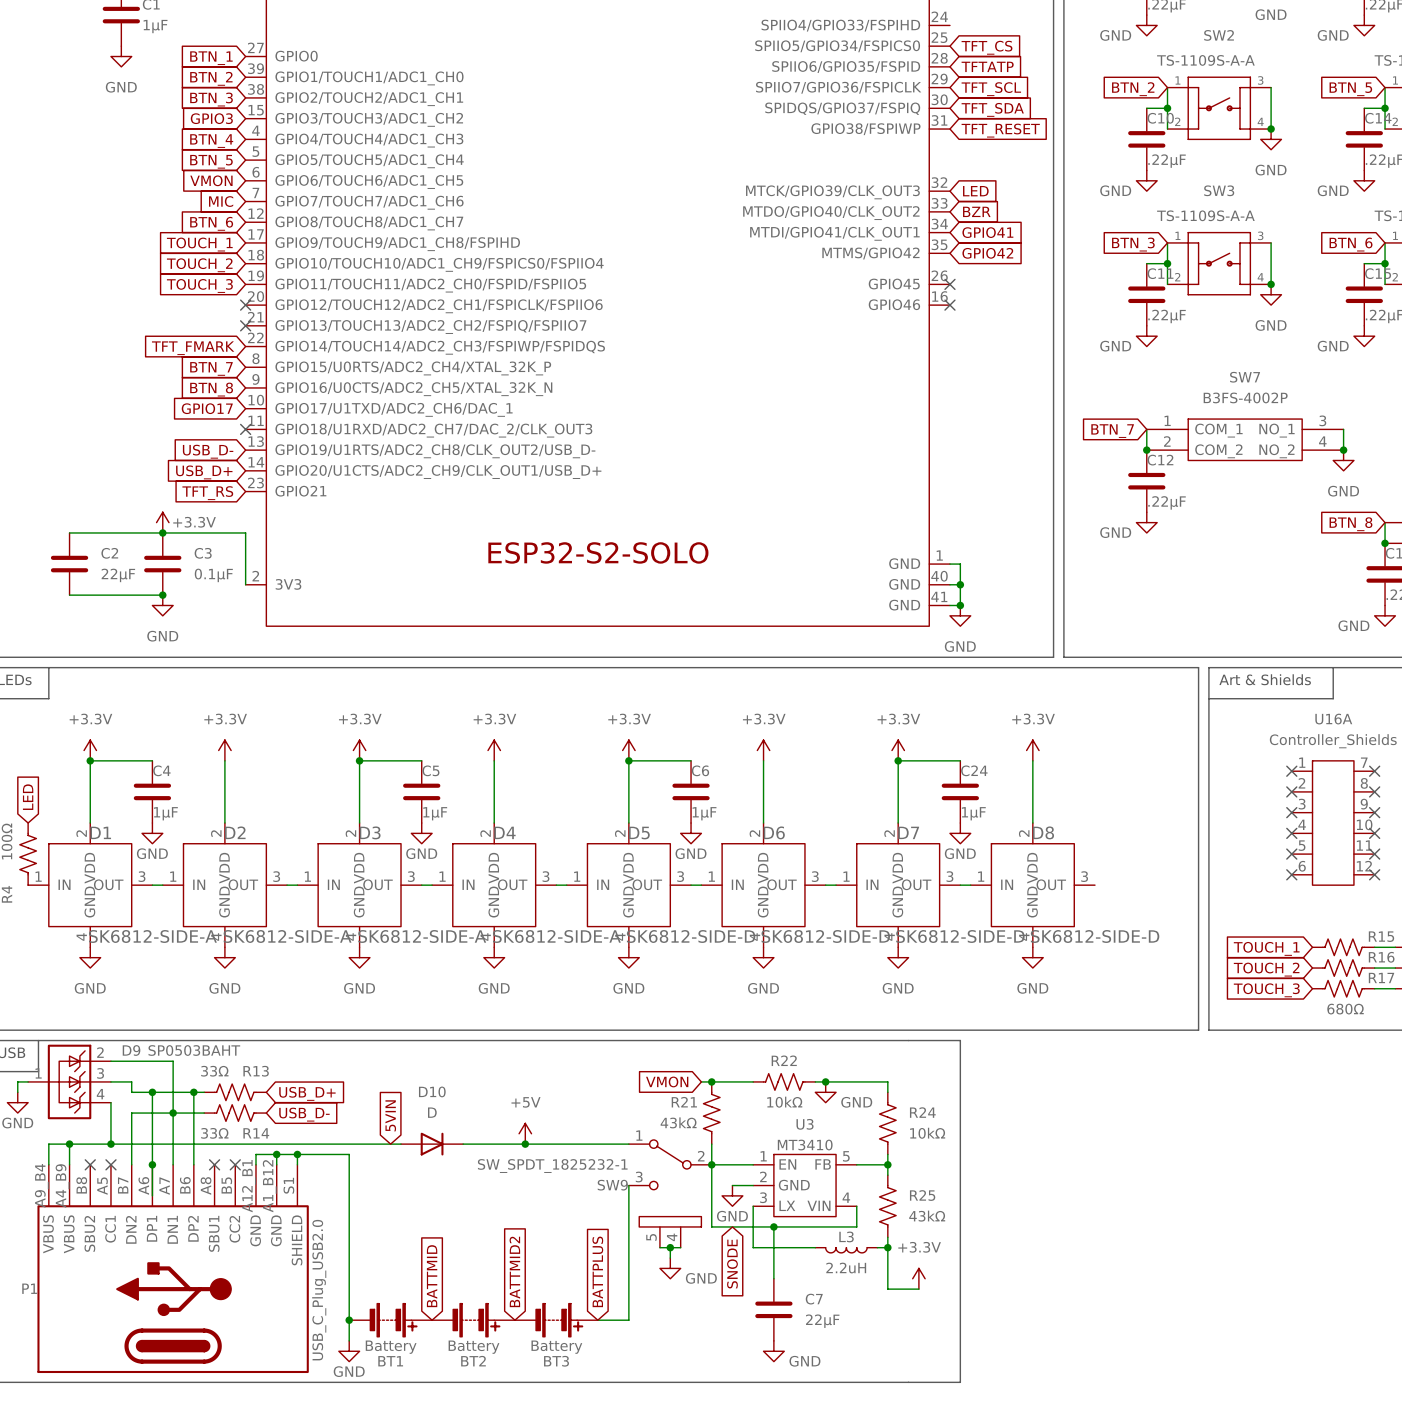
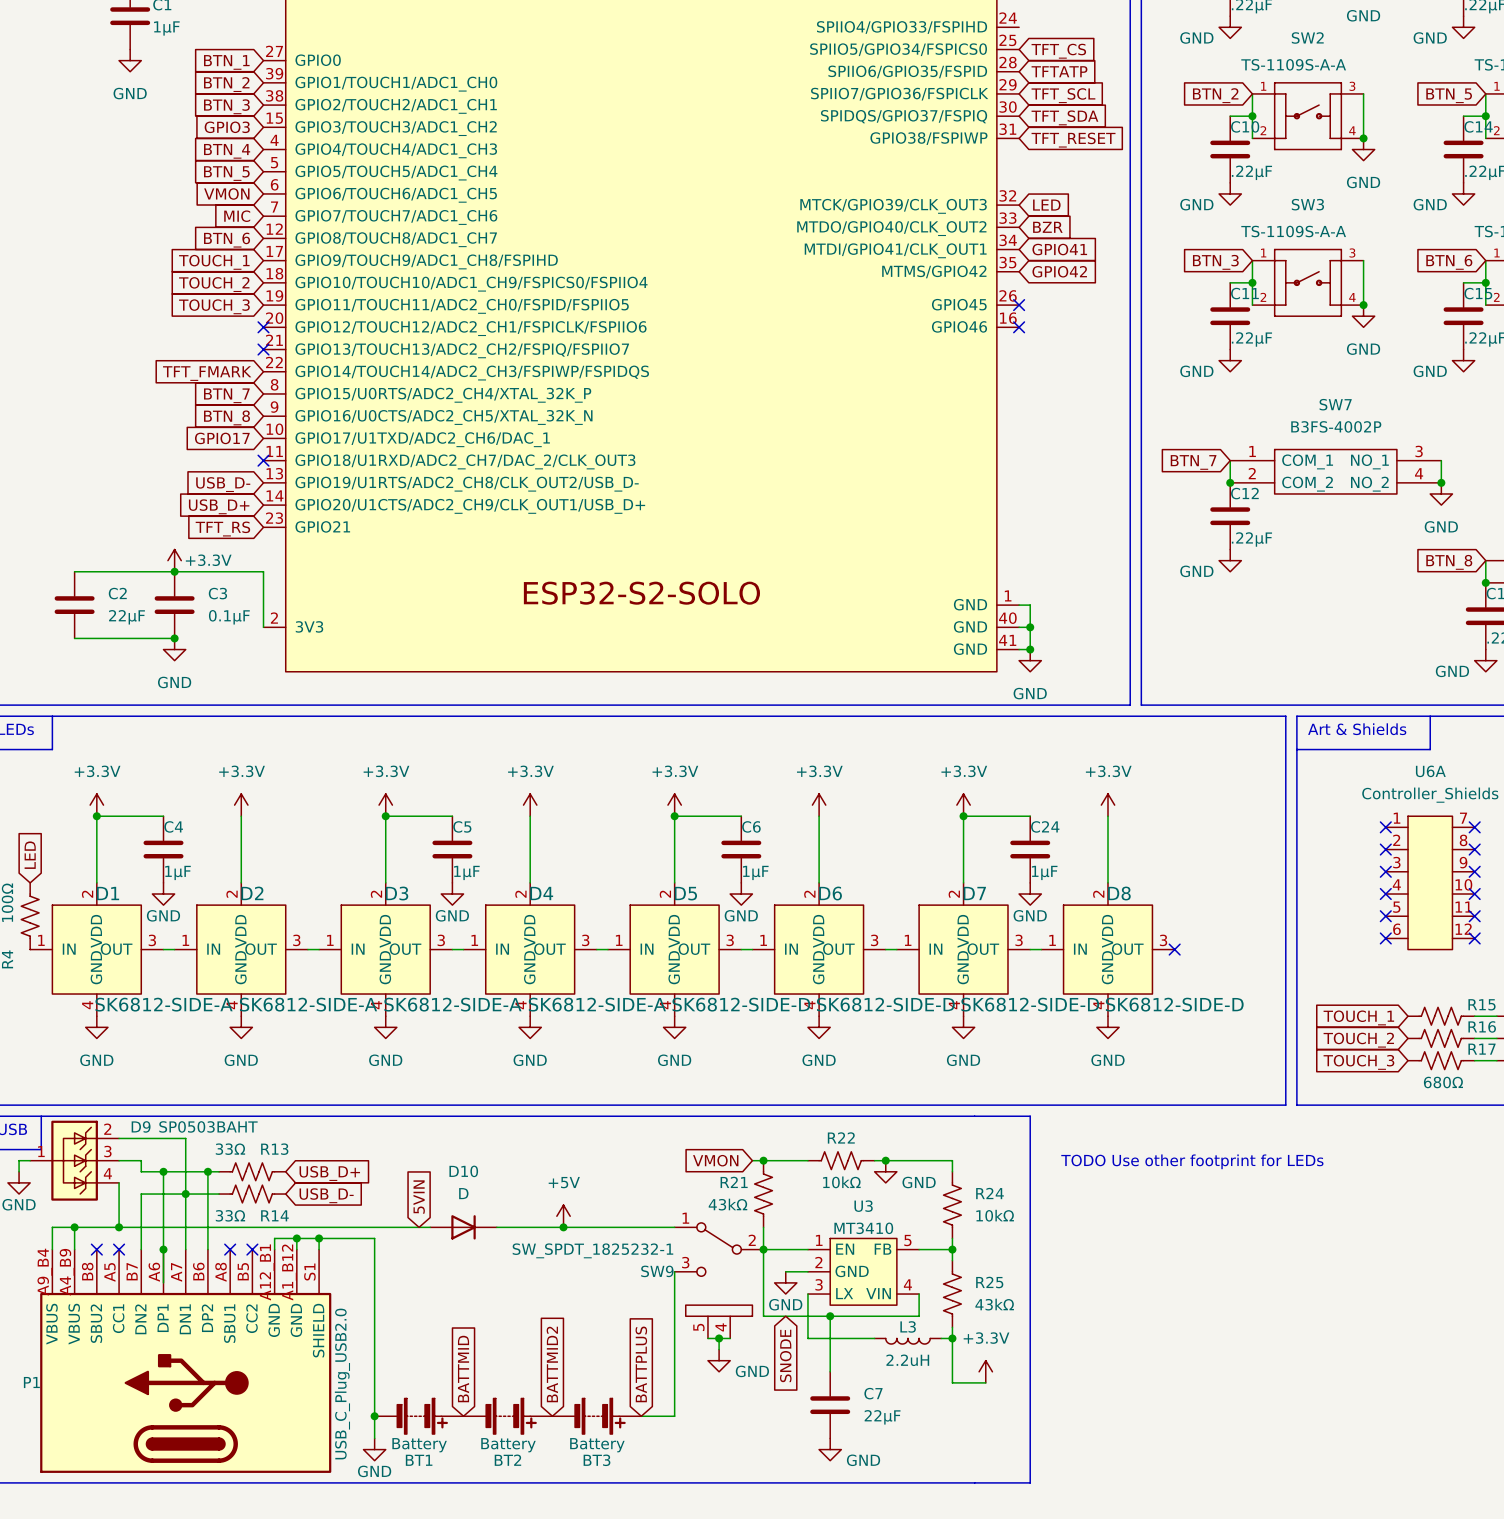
U16A name: U16A (1333, 719) -> U6A (1430, 771)
no-connect mark: none -> (1174, 949)
text: none -> TODO Use other footprint for LEDs (1192, 1161)

